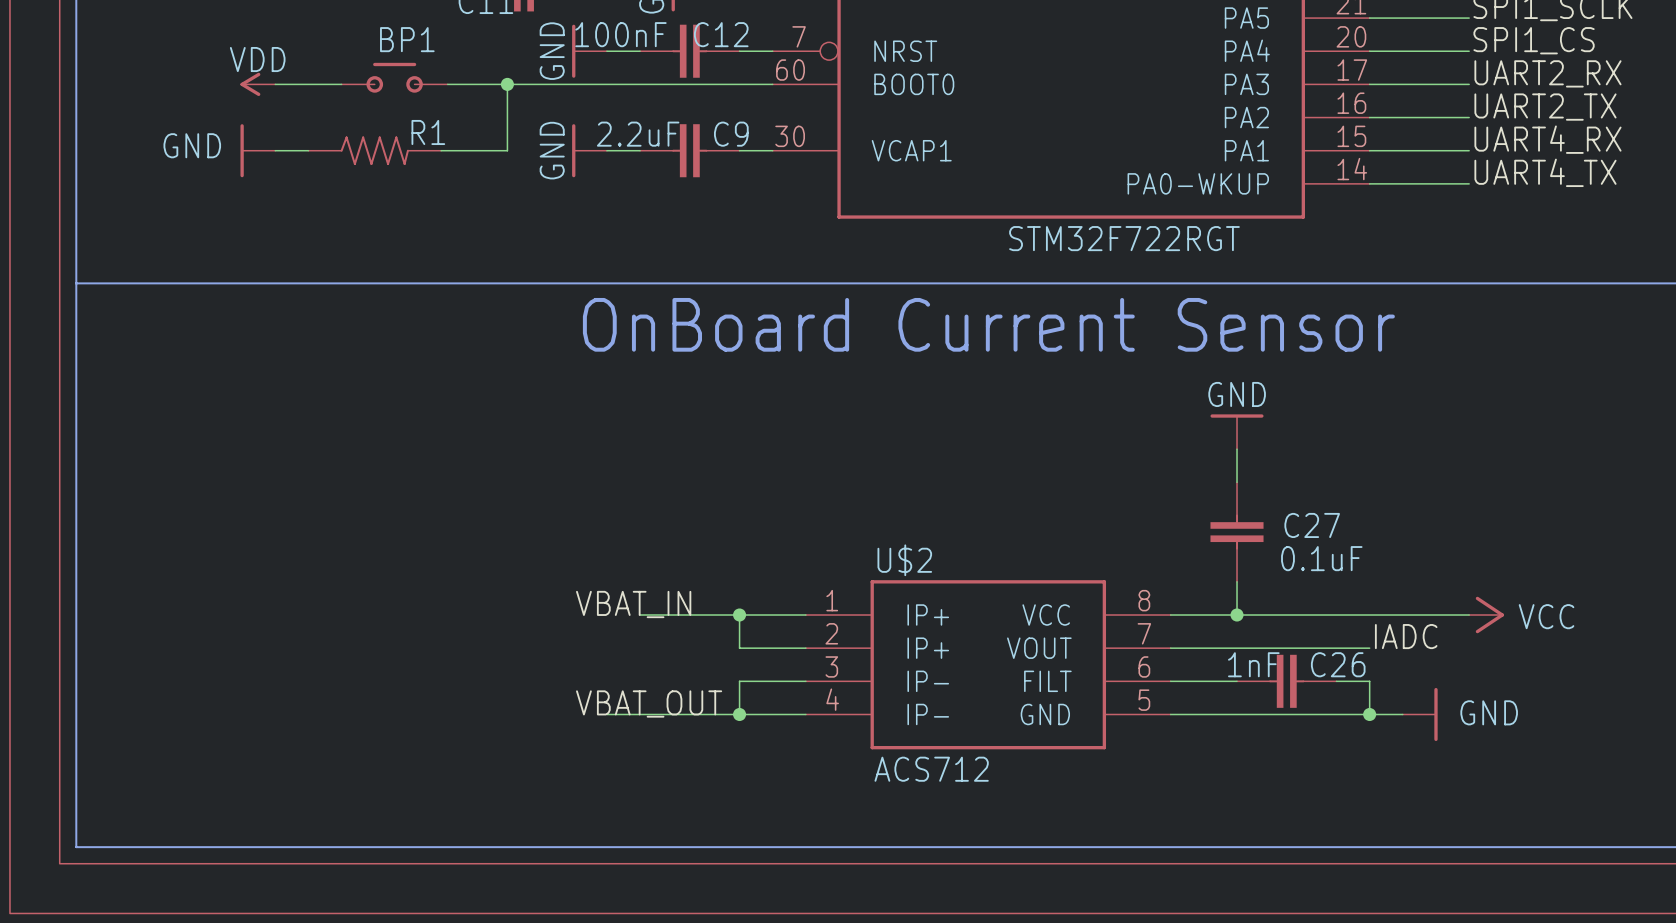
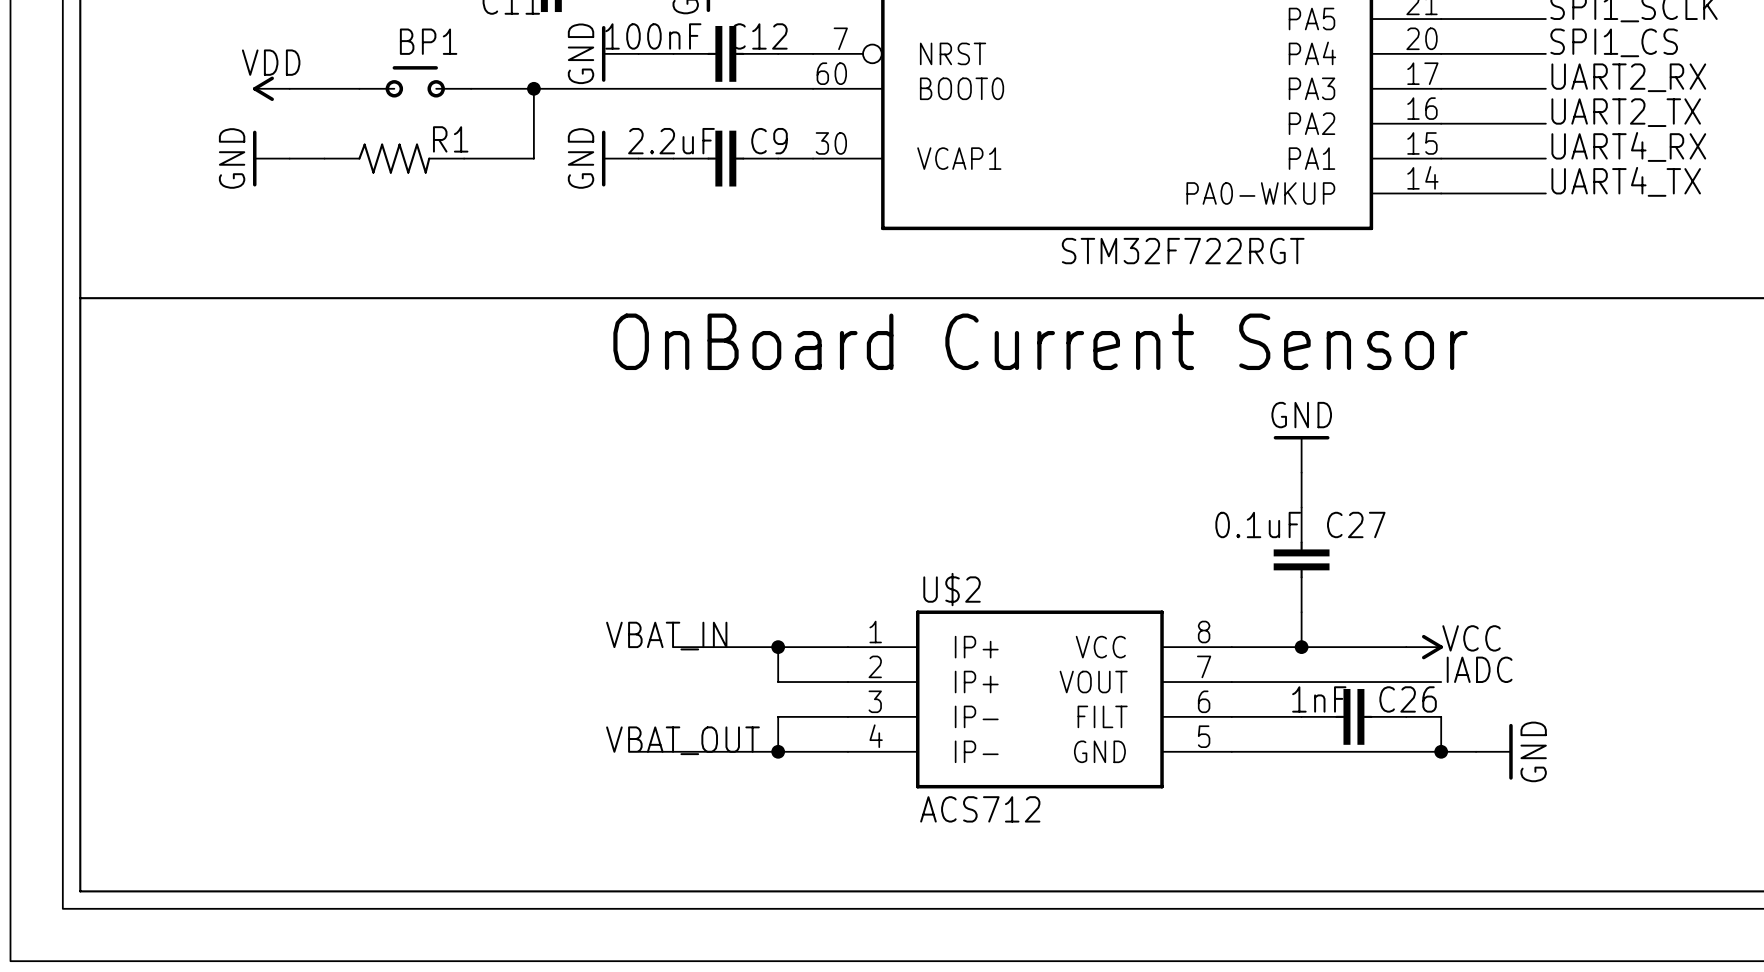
power symbol text rotation: 0° (192, 145) -> 90° counterclockwise (232, 158)
C27 name position: C27 (1312, 525) -> C27 (1356, 524)
C27 value position: 0.1uF (1321, 558) -> 0.1uF (1258, 524)
wire: (1336, 615) (1469, 615) -> none
power symbol: none -> VCC (1424, 647)
power symbol: VCC (1486, 615) -> none
power symbol text rotation: 0° (1489, 712) -> 90° counterclockwise (1533, 751)

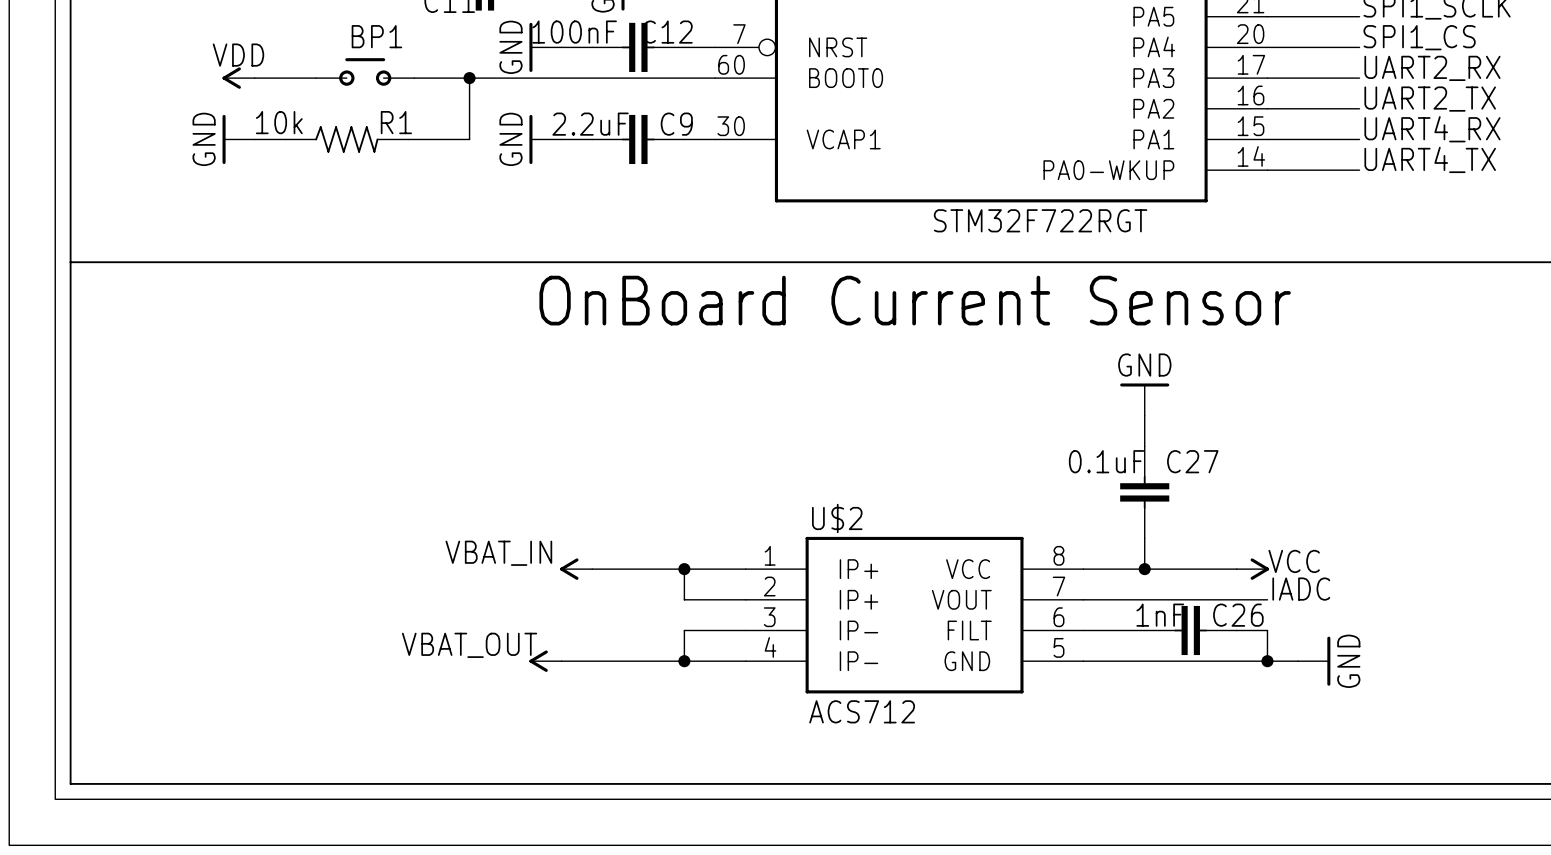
R1 value: none -> 10k (279, 122)
label: VBAT_IN (666, 636) -> none
power symbol: none -> VBAT_IN (576, 569)
label: VBAT_OUT (682, 740) -> none
power symbol: none -> VBAT_OUT (545, 661)

